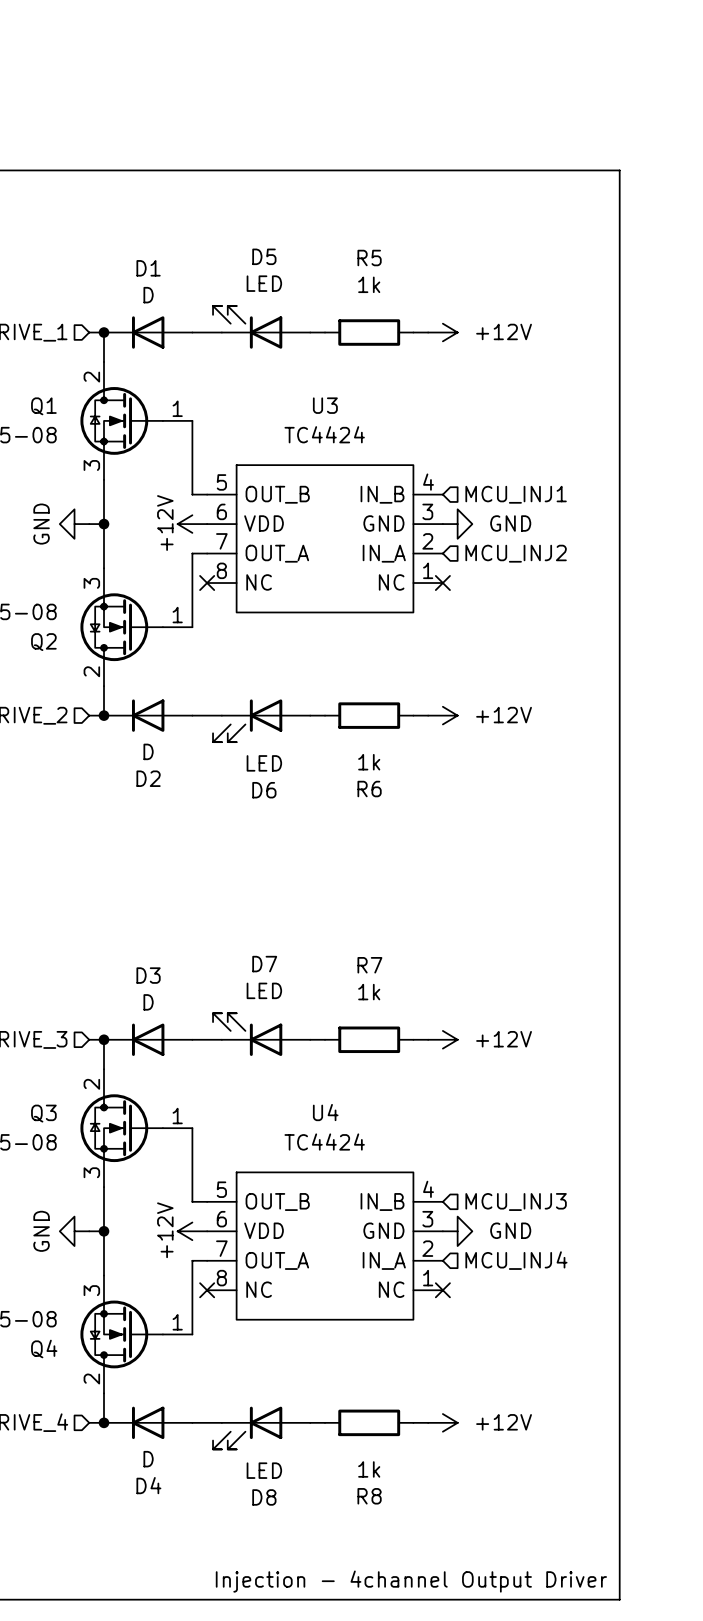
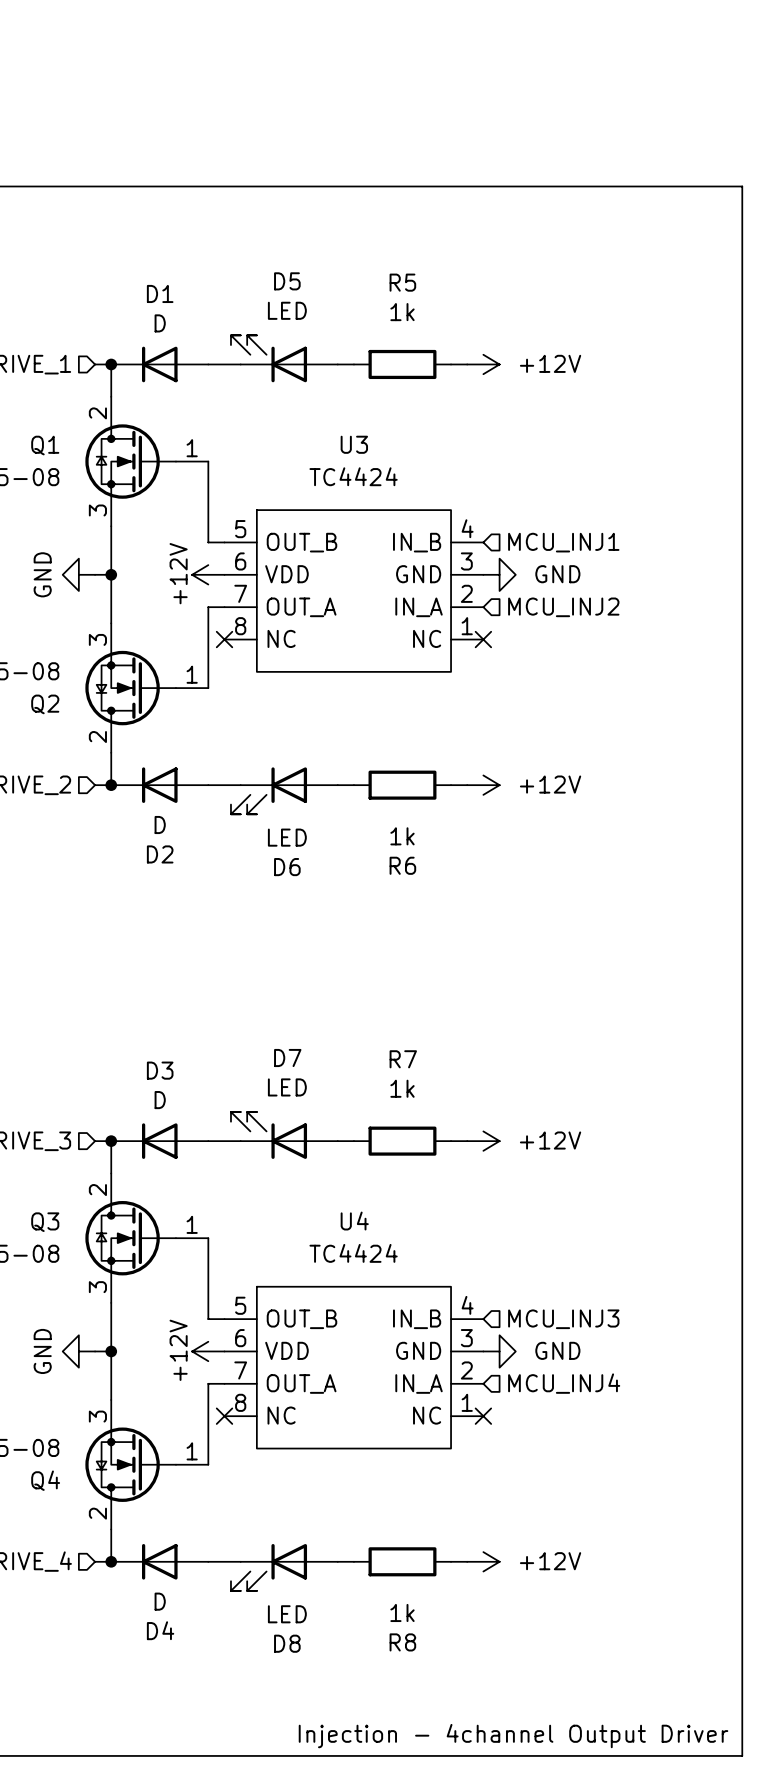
line: (619, 170) (619, 1599) -> (677, 186) (742, 186) (742, 1755) (677, 1755)
text position: Injection - 4channel Output Driver (411, 1581) -> Injection - 4channel Output Driver (513, 1736)

